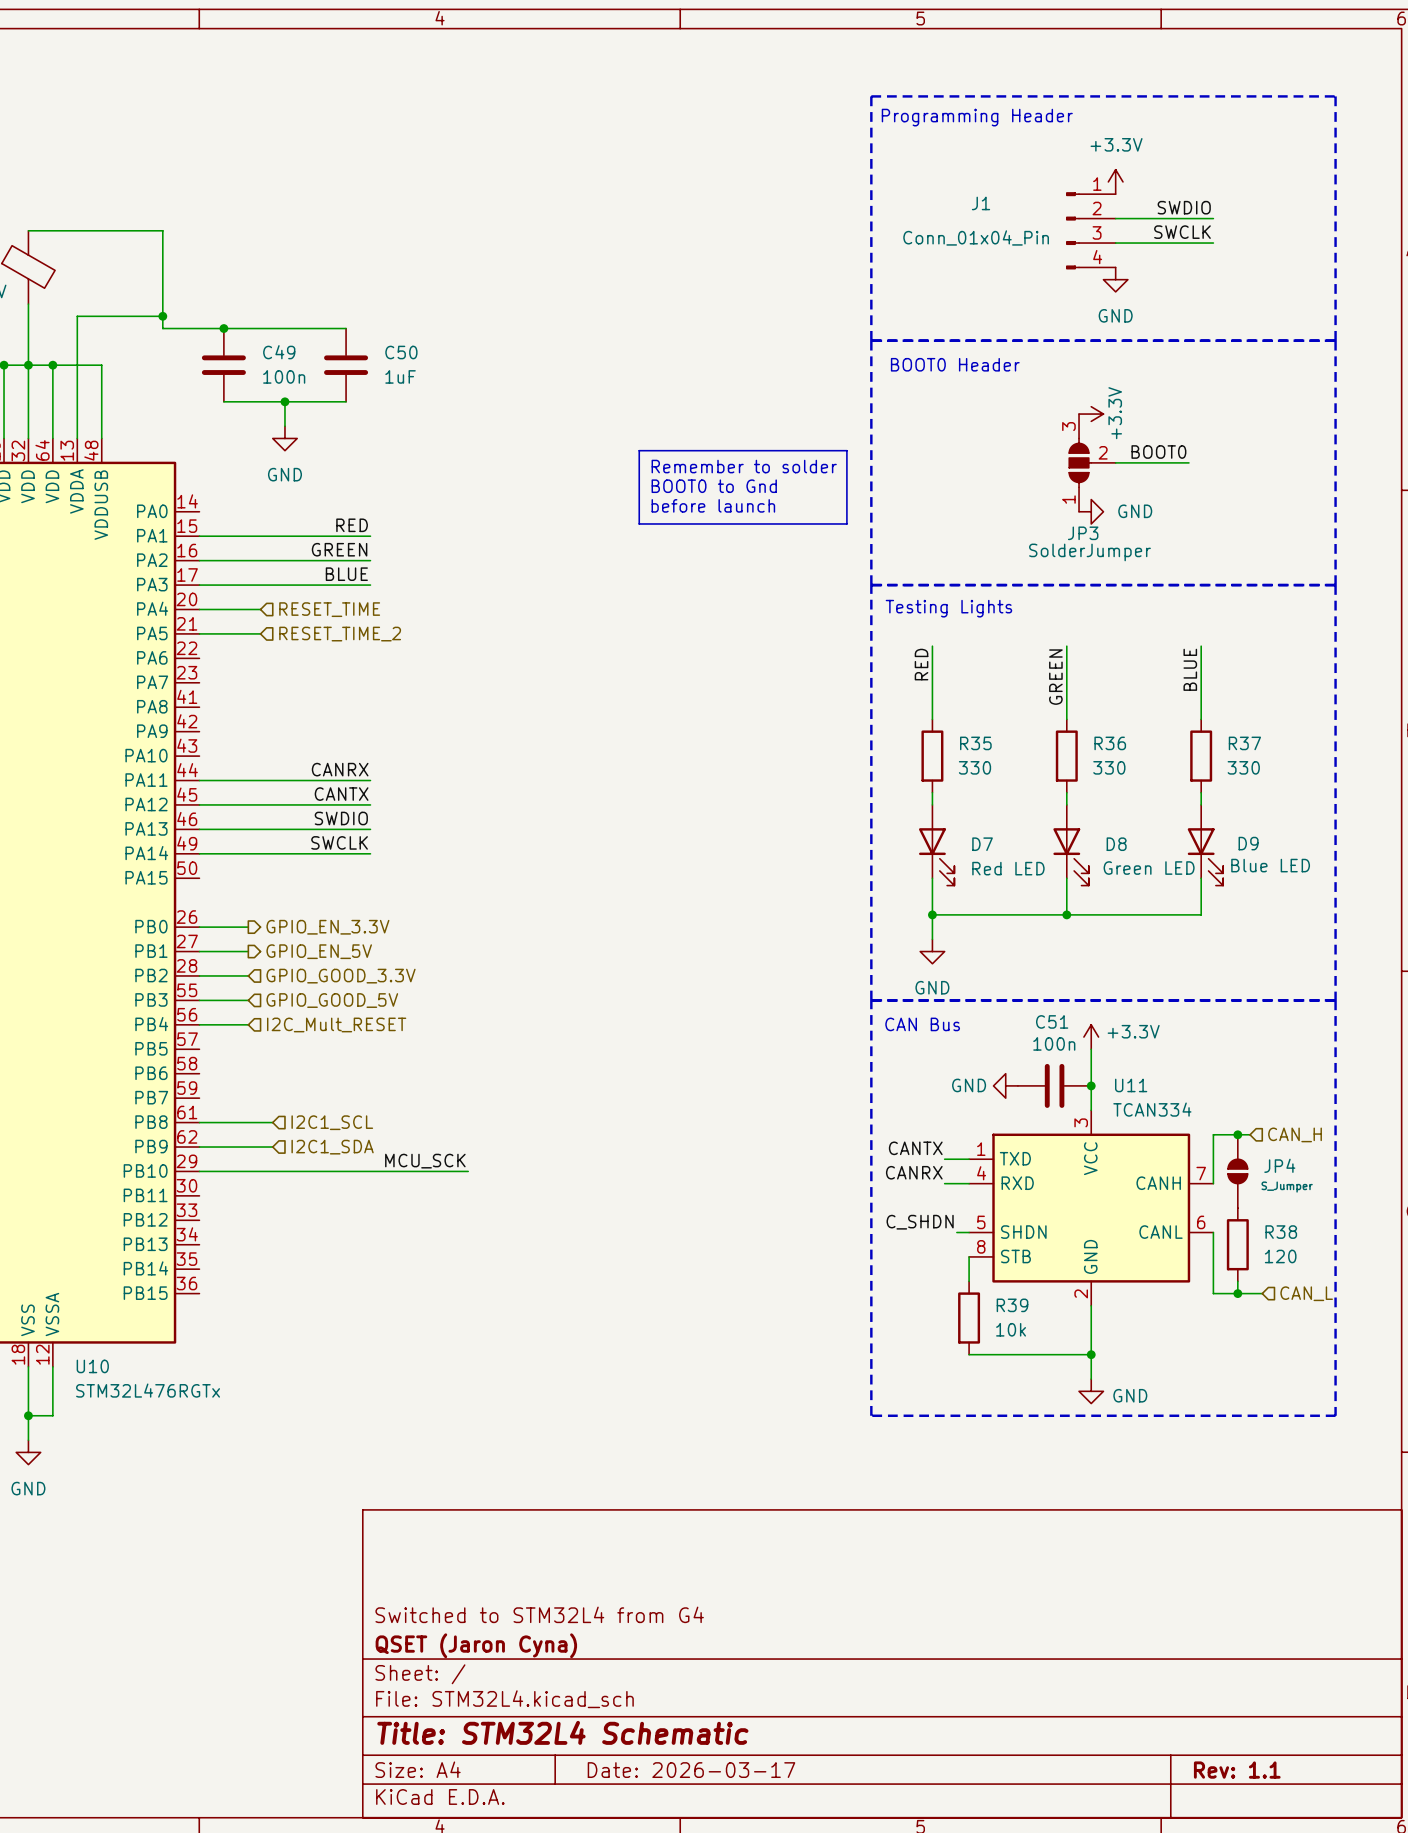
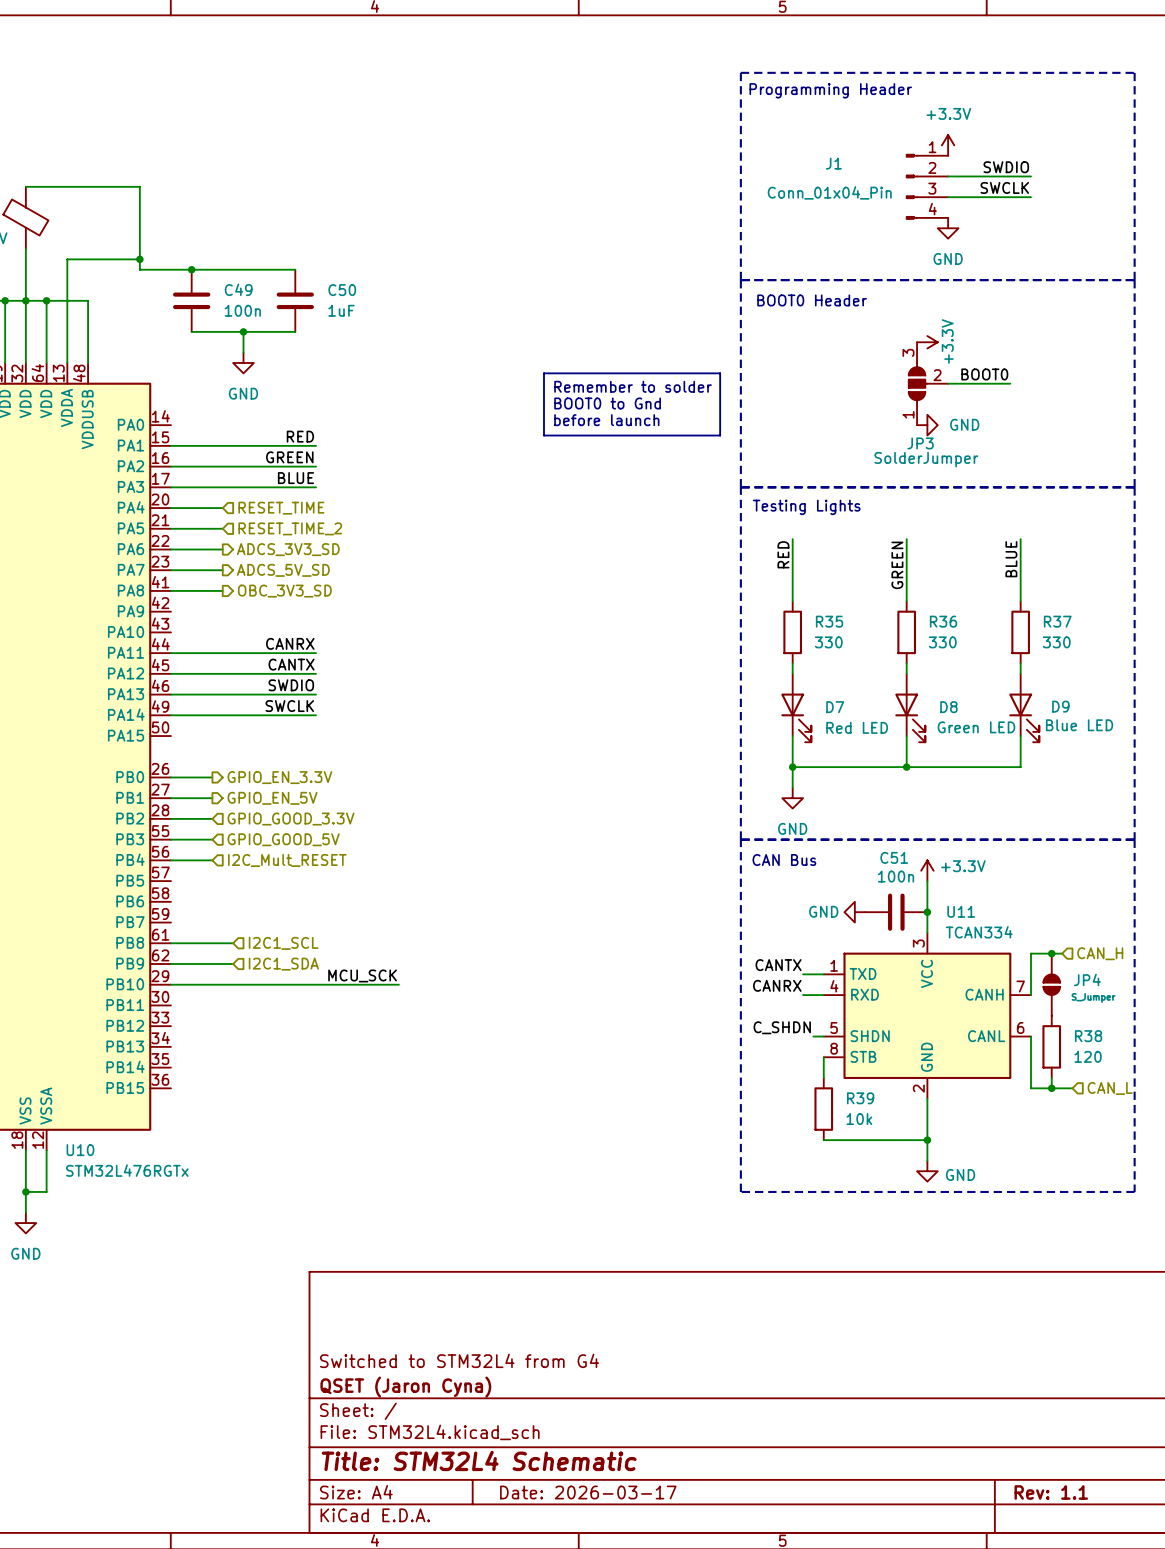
wire: none -> (170, 549) (222, 549)
hierarchical label: none -> ADCS_3V3_SD (288, 549)
wire: none -> (170, 570) (222, 570)
hierarchical label: none -> ADCS_5V_SD (283, 570)
wire: none -> (170, 590) (222, 590)
hierarchical label: none -> OBC_3V3_SD (284, 591)

